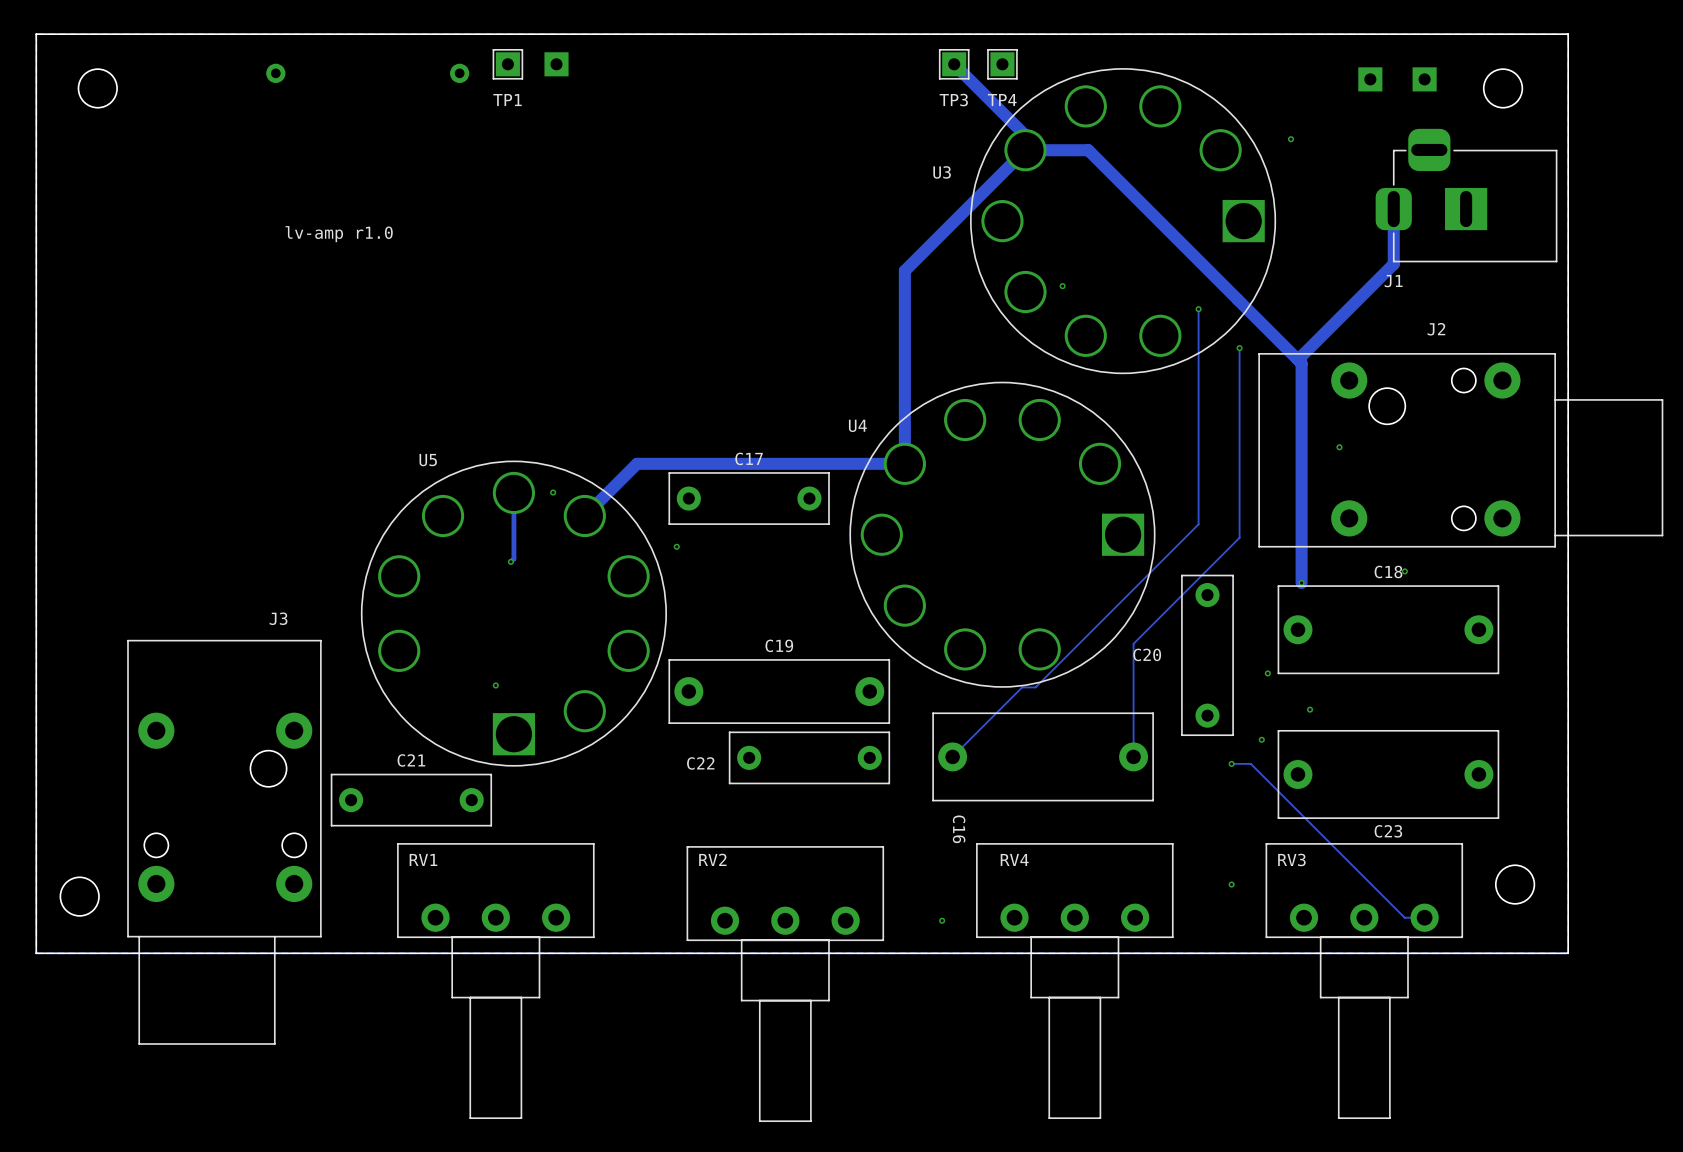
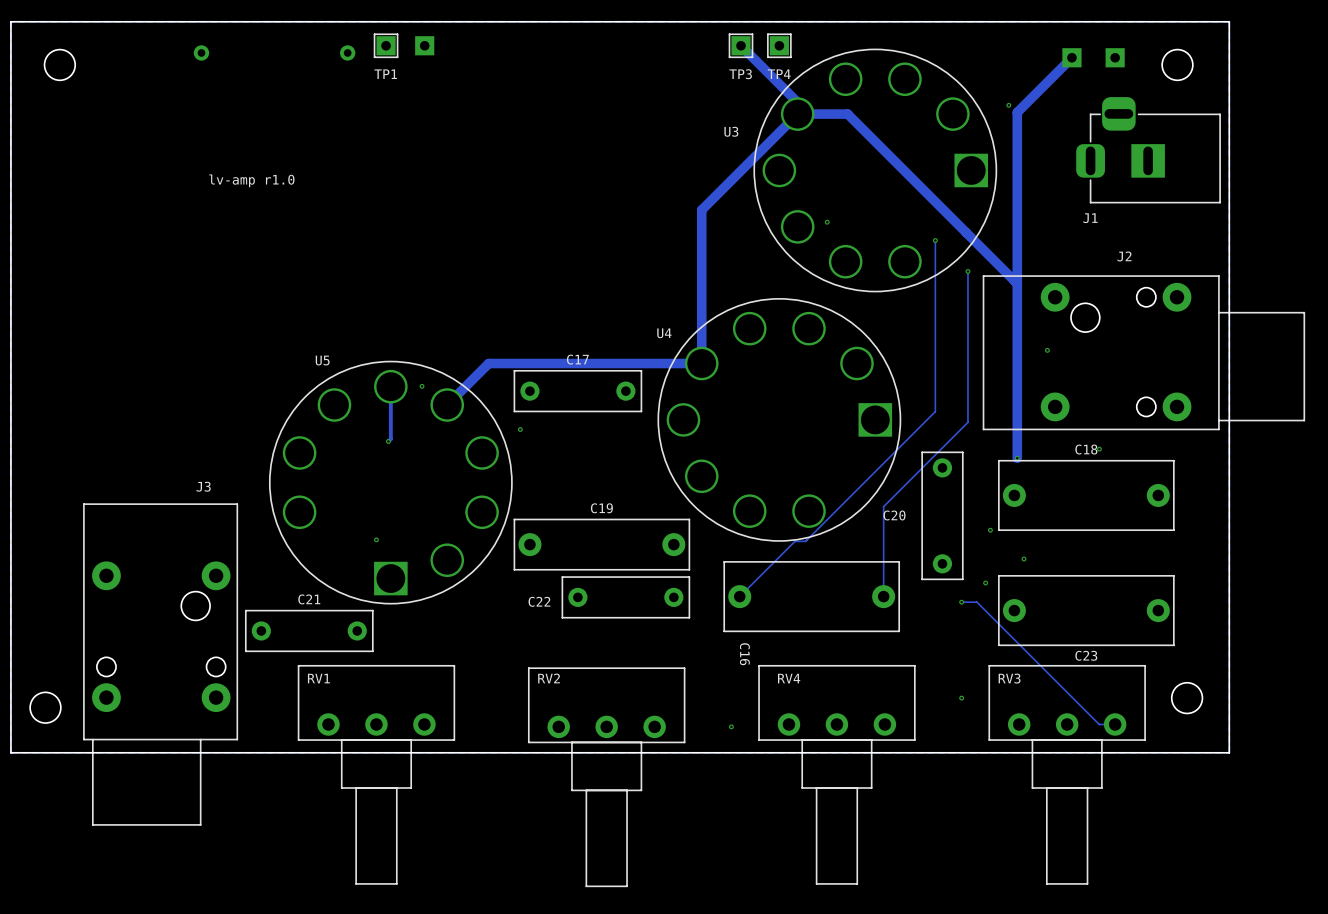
track: none -> (1071, 57) (1017, 112) (1017, 283)
track: (1393, 209) (1393, 264) (1297, 359) -> none

